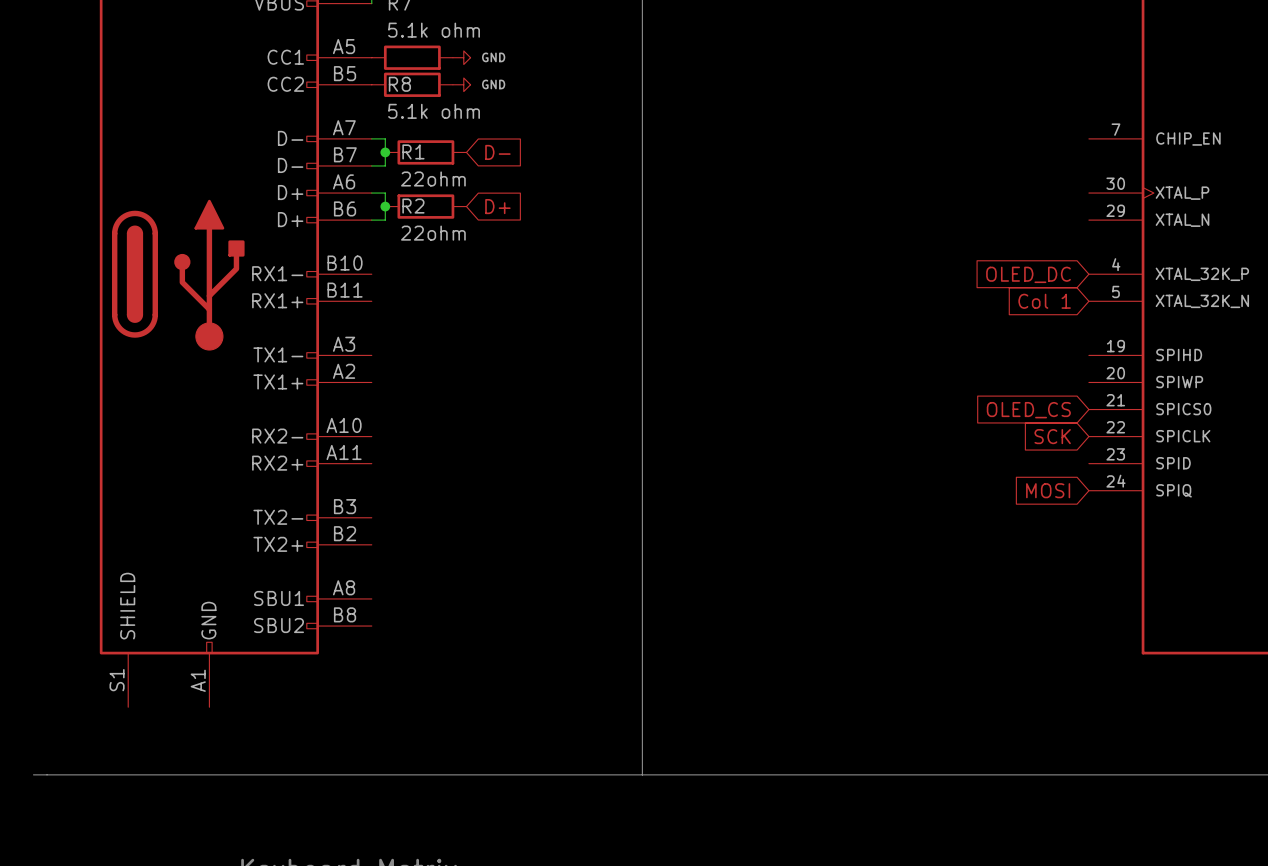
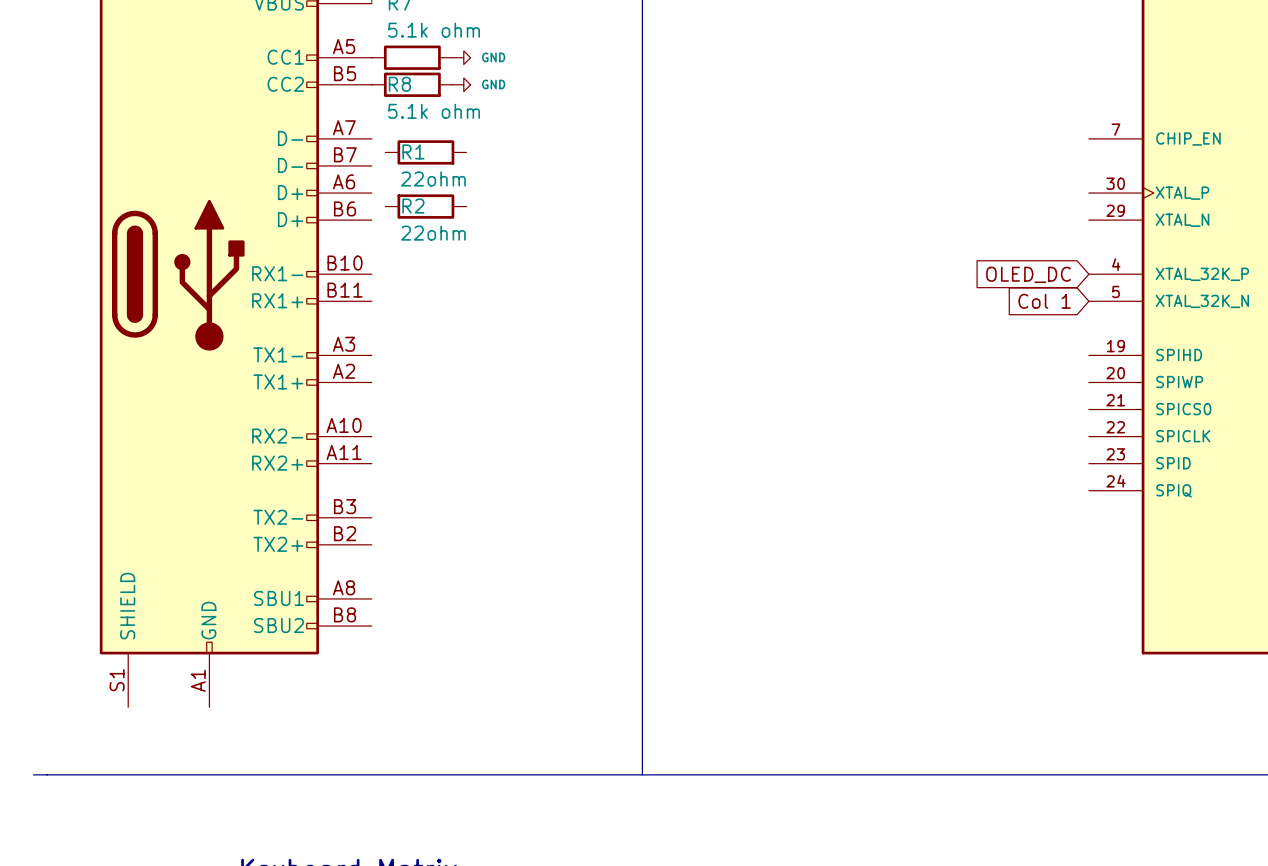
wire: (371, 138) (385, 138) (385, 165) (371, 165) -> none
junction: (385, 152) -> none
global label: D- (497, 152) -> none
wire: (371, 193) (385, 193) (385, 220) (371, 220) -> none
junction: (385, 206) -> none
global label: D+ (497, 206) -> none
global label: OLED_CS (1028, 410) -> none
global label: SCK (1052, 436) -> none
global label: MOSI (1048, 490) -> none

